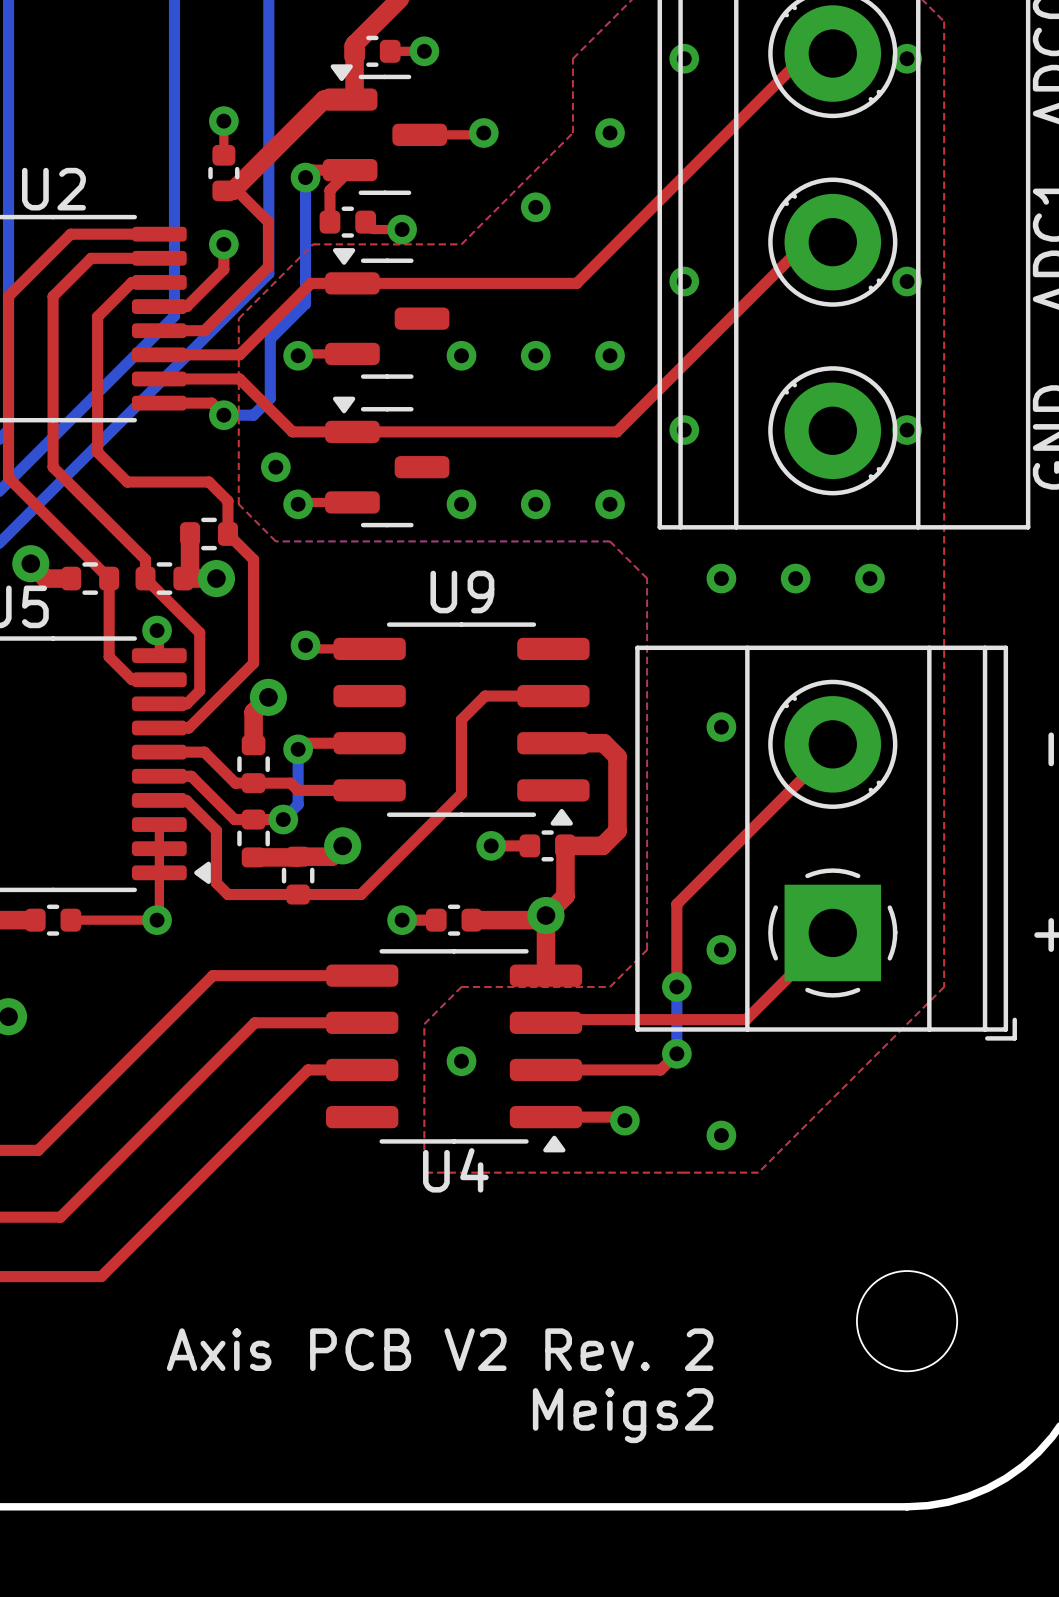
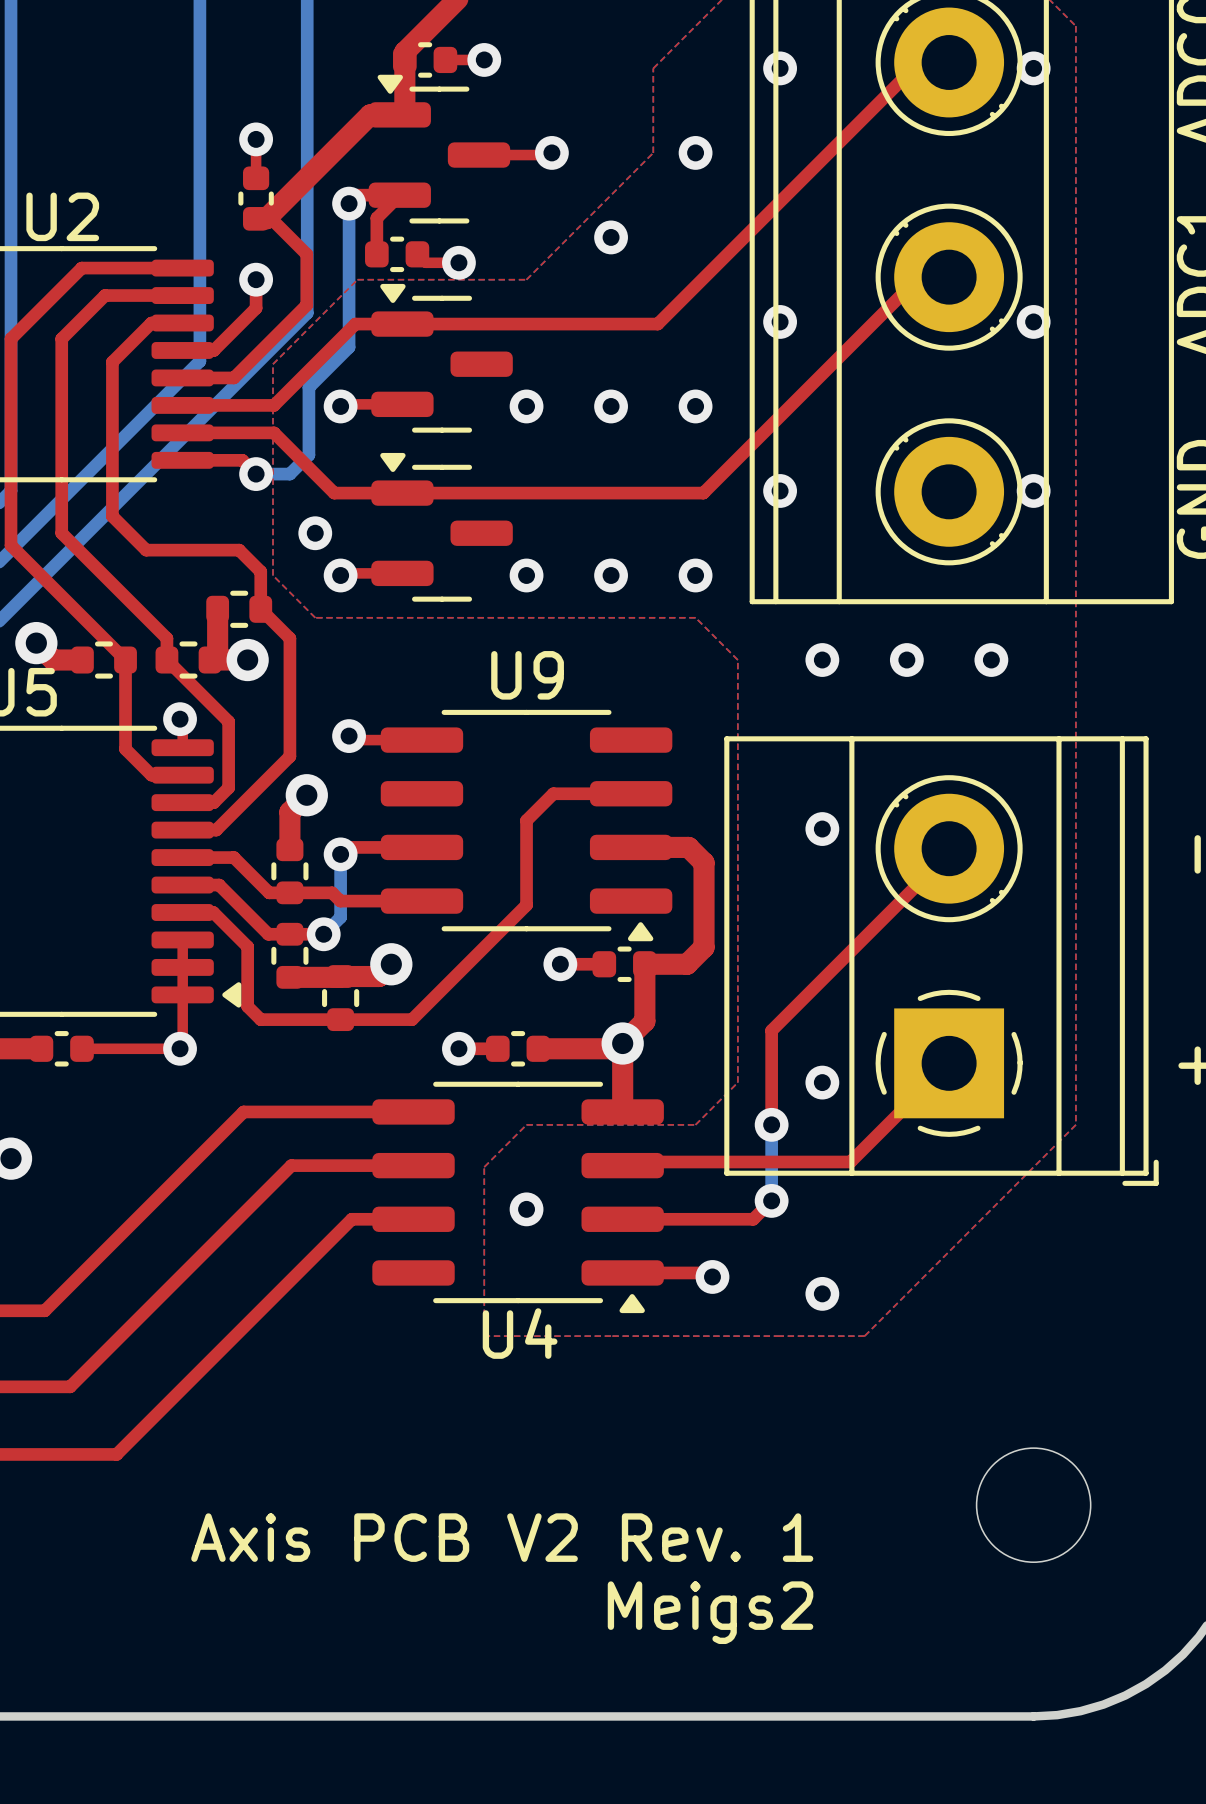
text: Axis PCB V2 Rev. 2 (440, 1349) -> Axis PCB V2 Rev. 1 (502, 1537)

